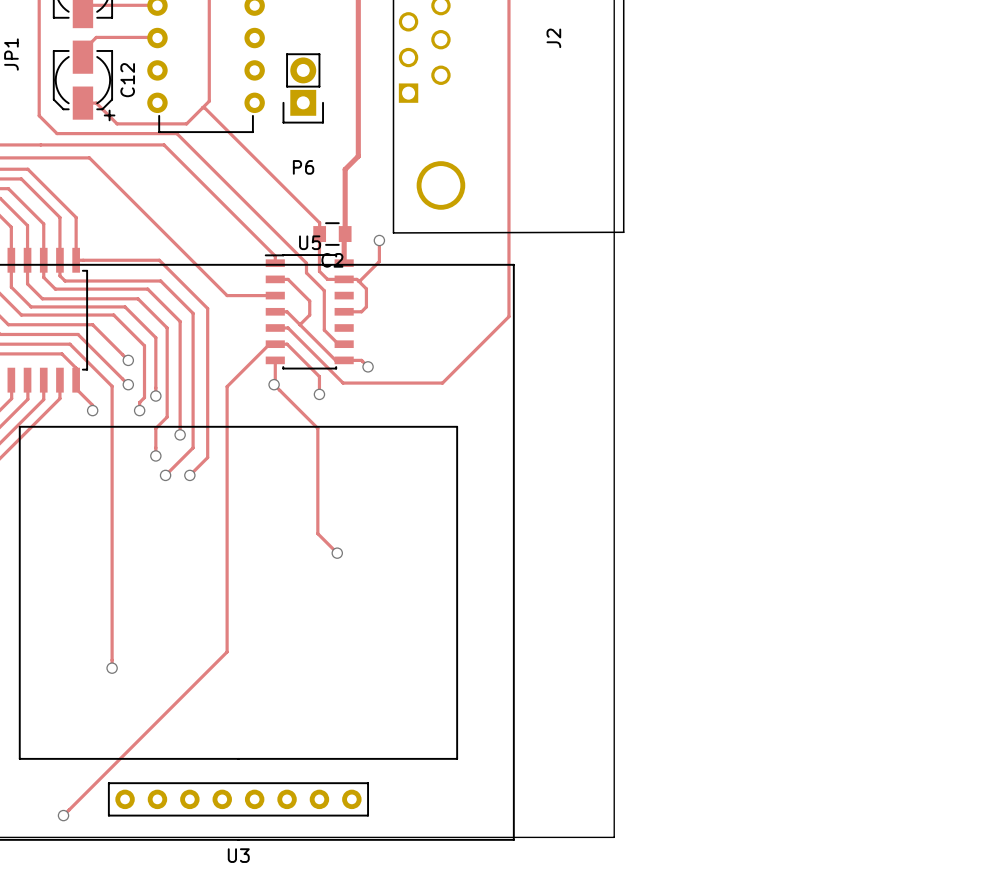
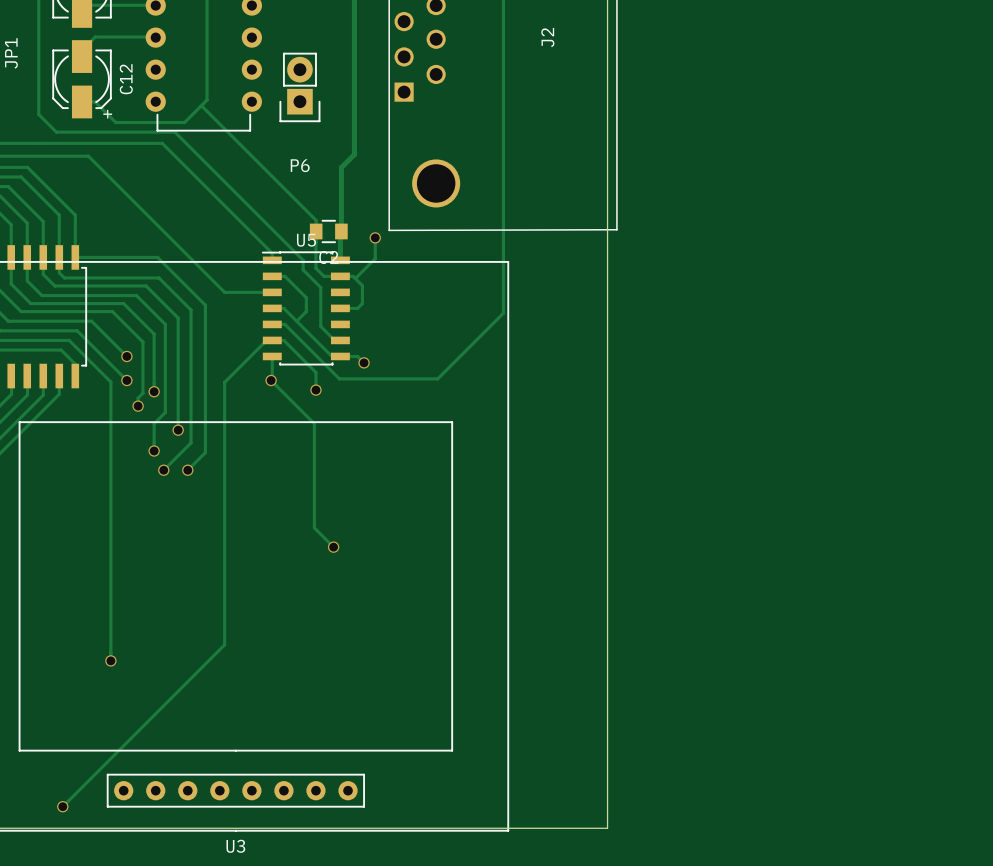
track: (76, 380) (76, 388) (92, 405) (92, 410) -> none
via: (92, 410) -> none

